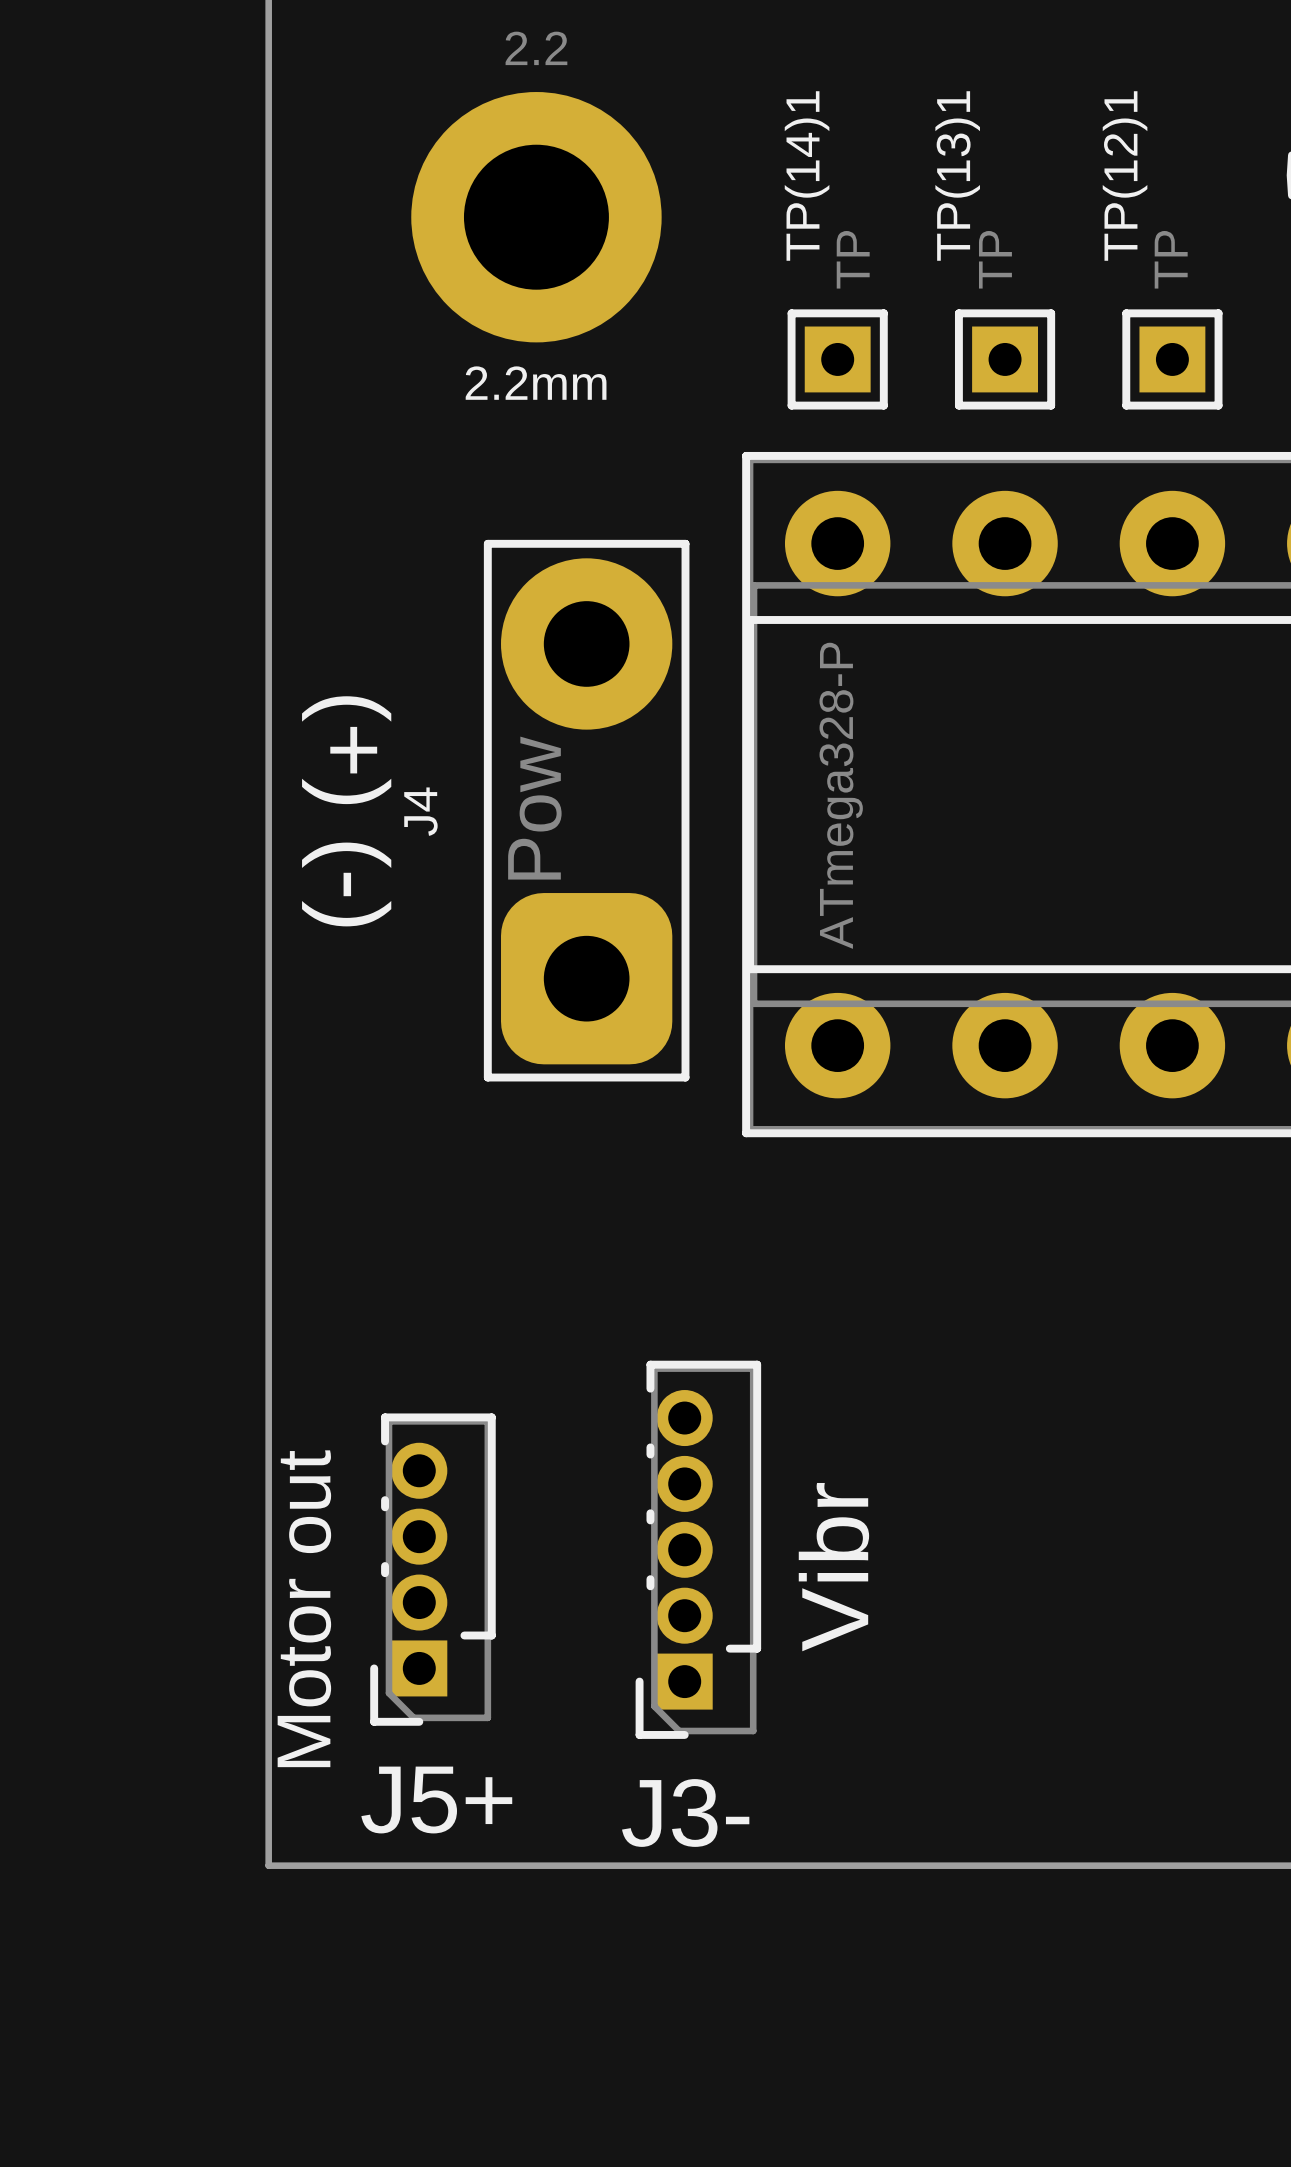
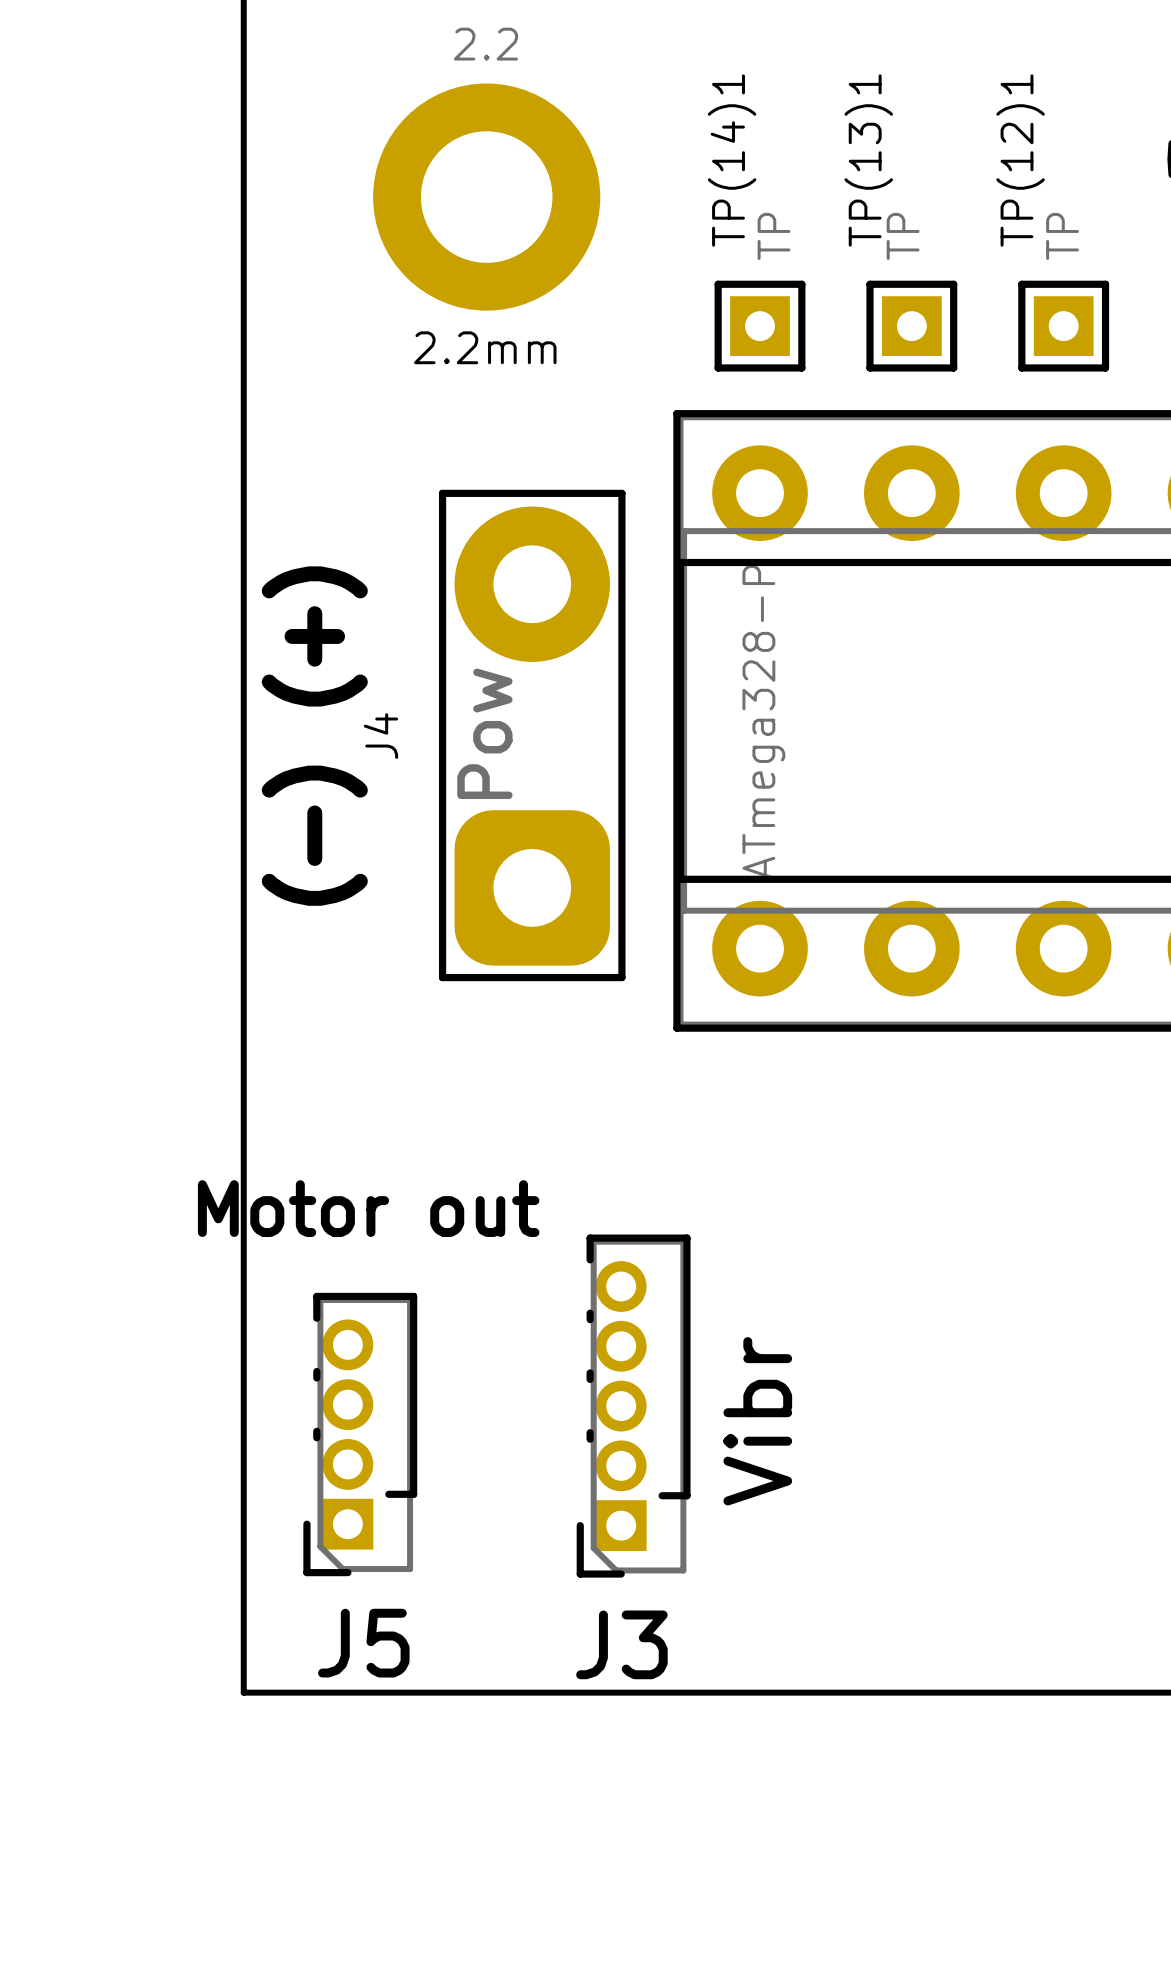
J5+ position: (432, 1569) -> (360, 1434)
J5+ value rotation: 0° (304, 1608) -> 90° clockwise (368, 1208)
J5+ name: J5+ (436, 1800) -> J5 (363, 1643)
J3- name: J3- (685, 1812) -> J3 (621, 1644)

